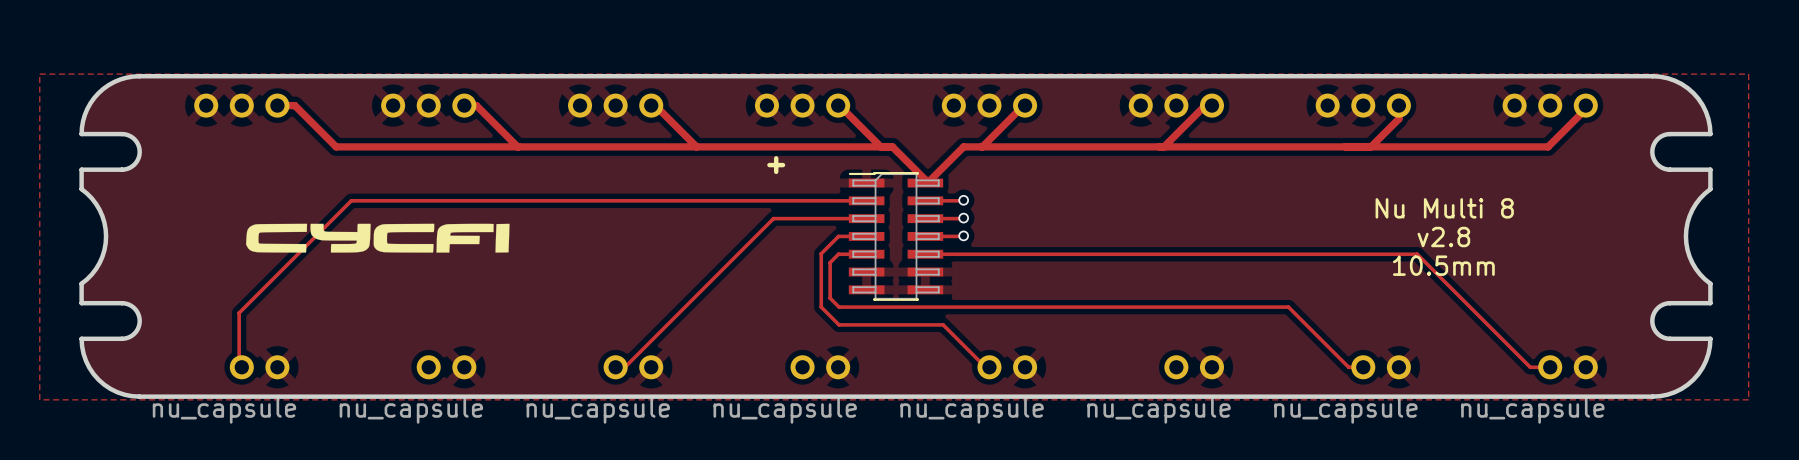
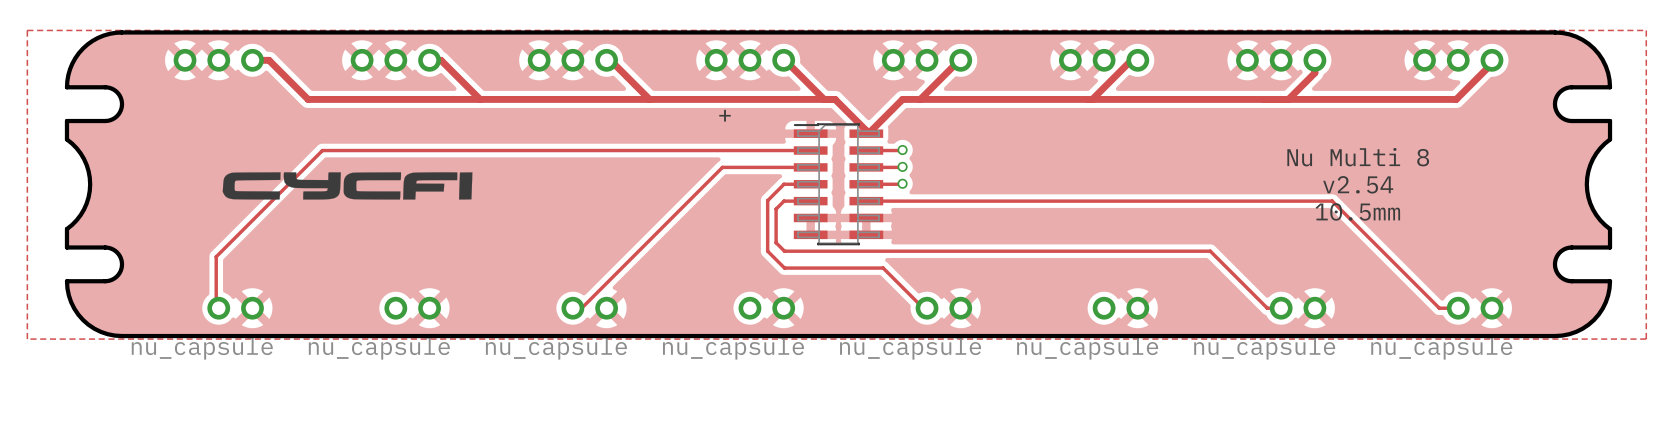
text: v2.8 (1443, 237) -> v2.54 (1358, 184)

